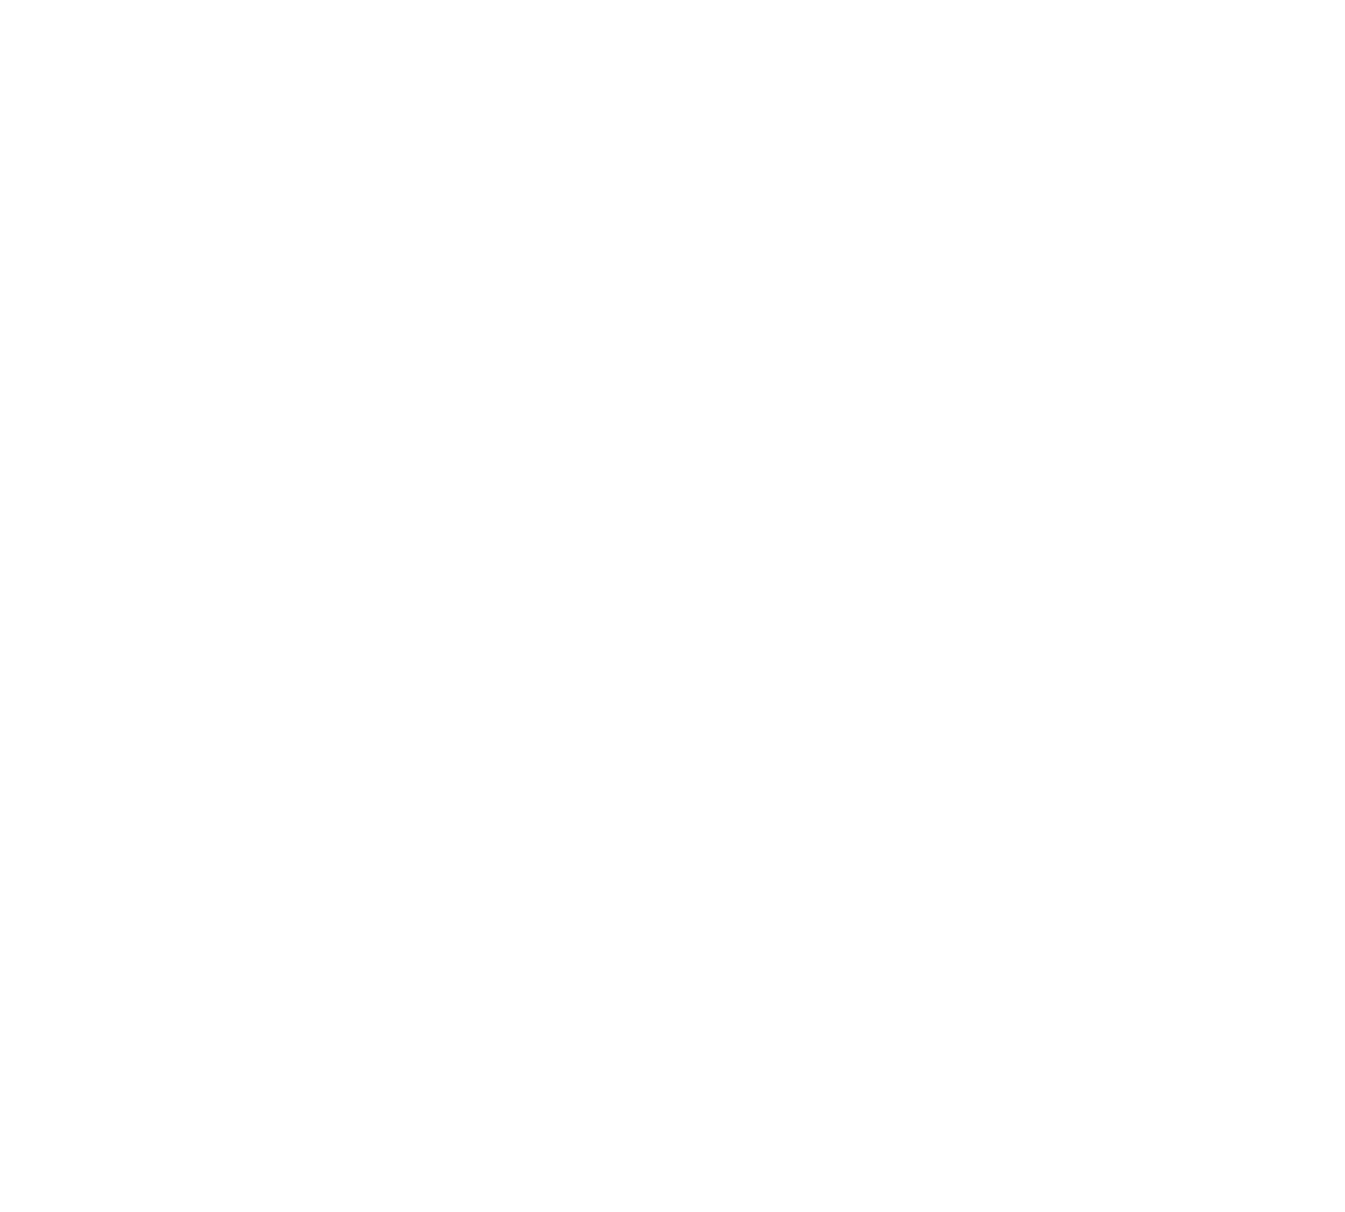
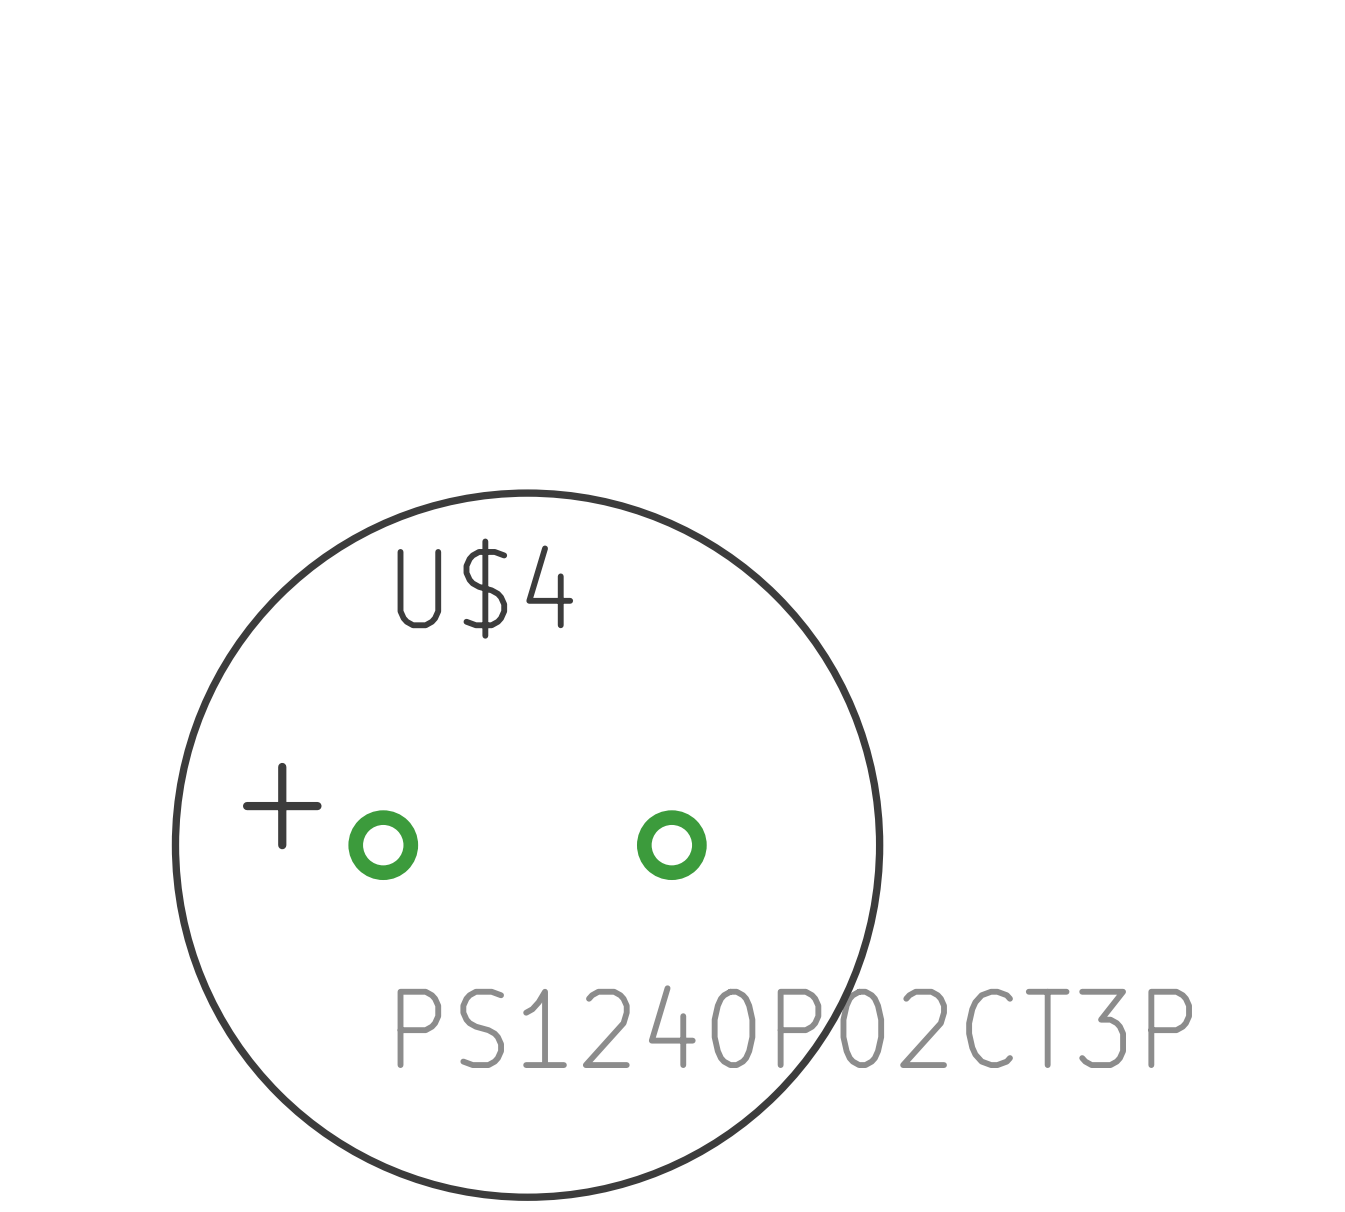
U$4: none -> PS1240P02CT3P (527, 845)

